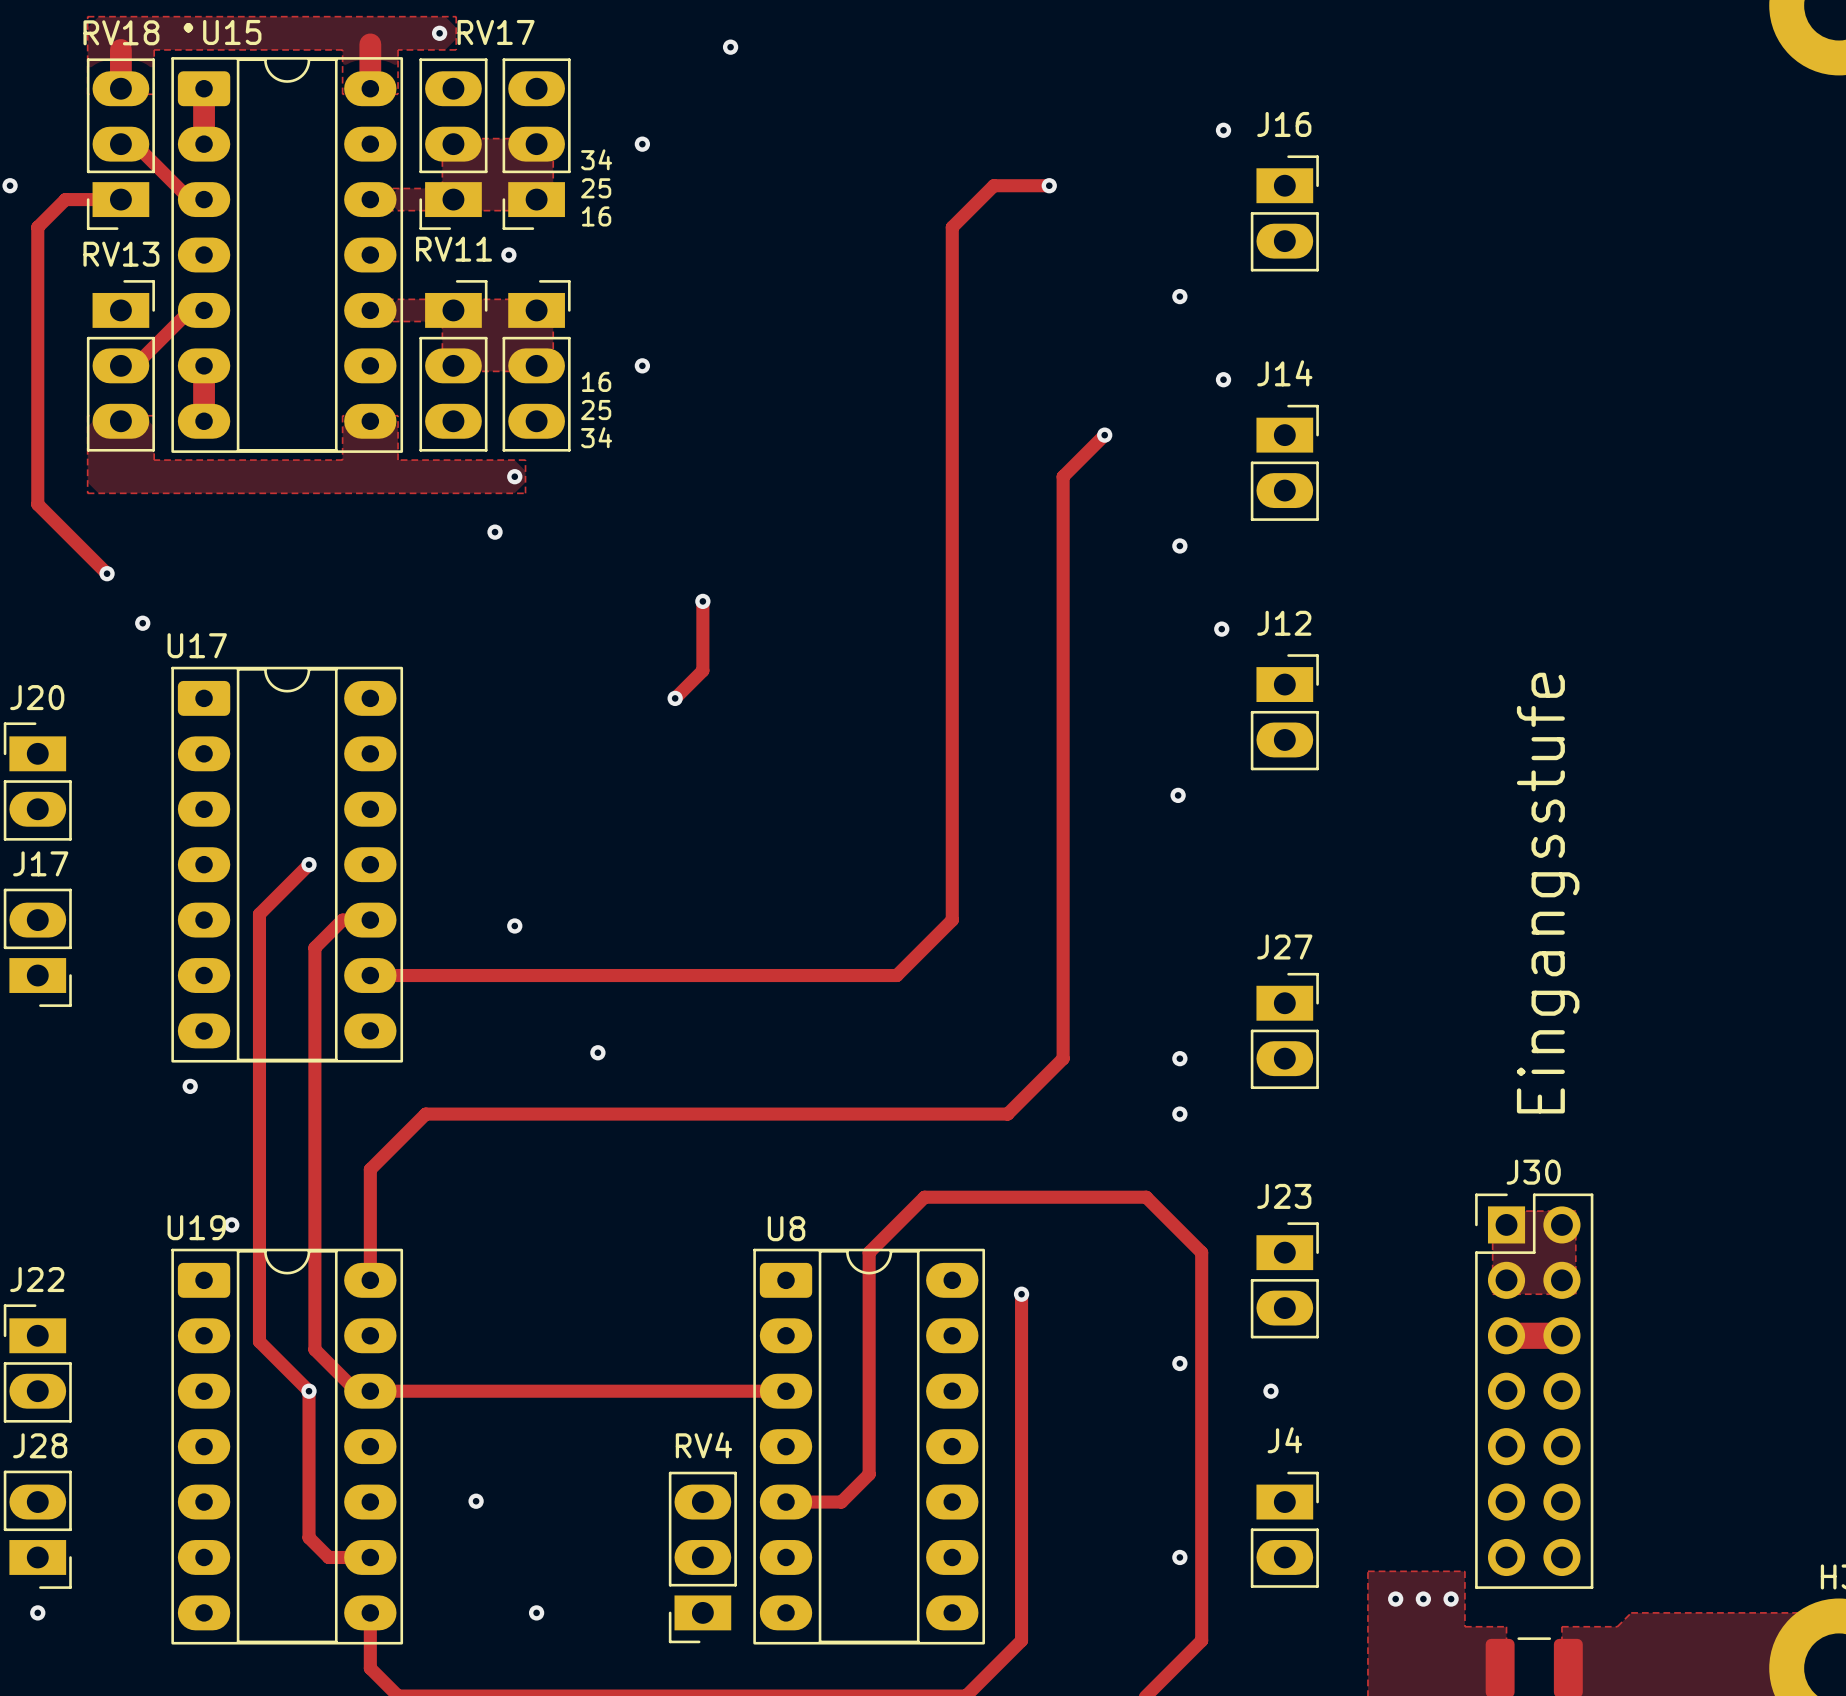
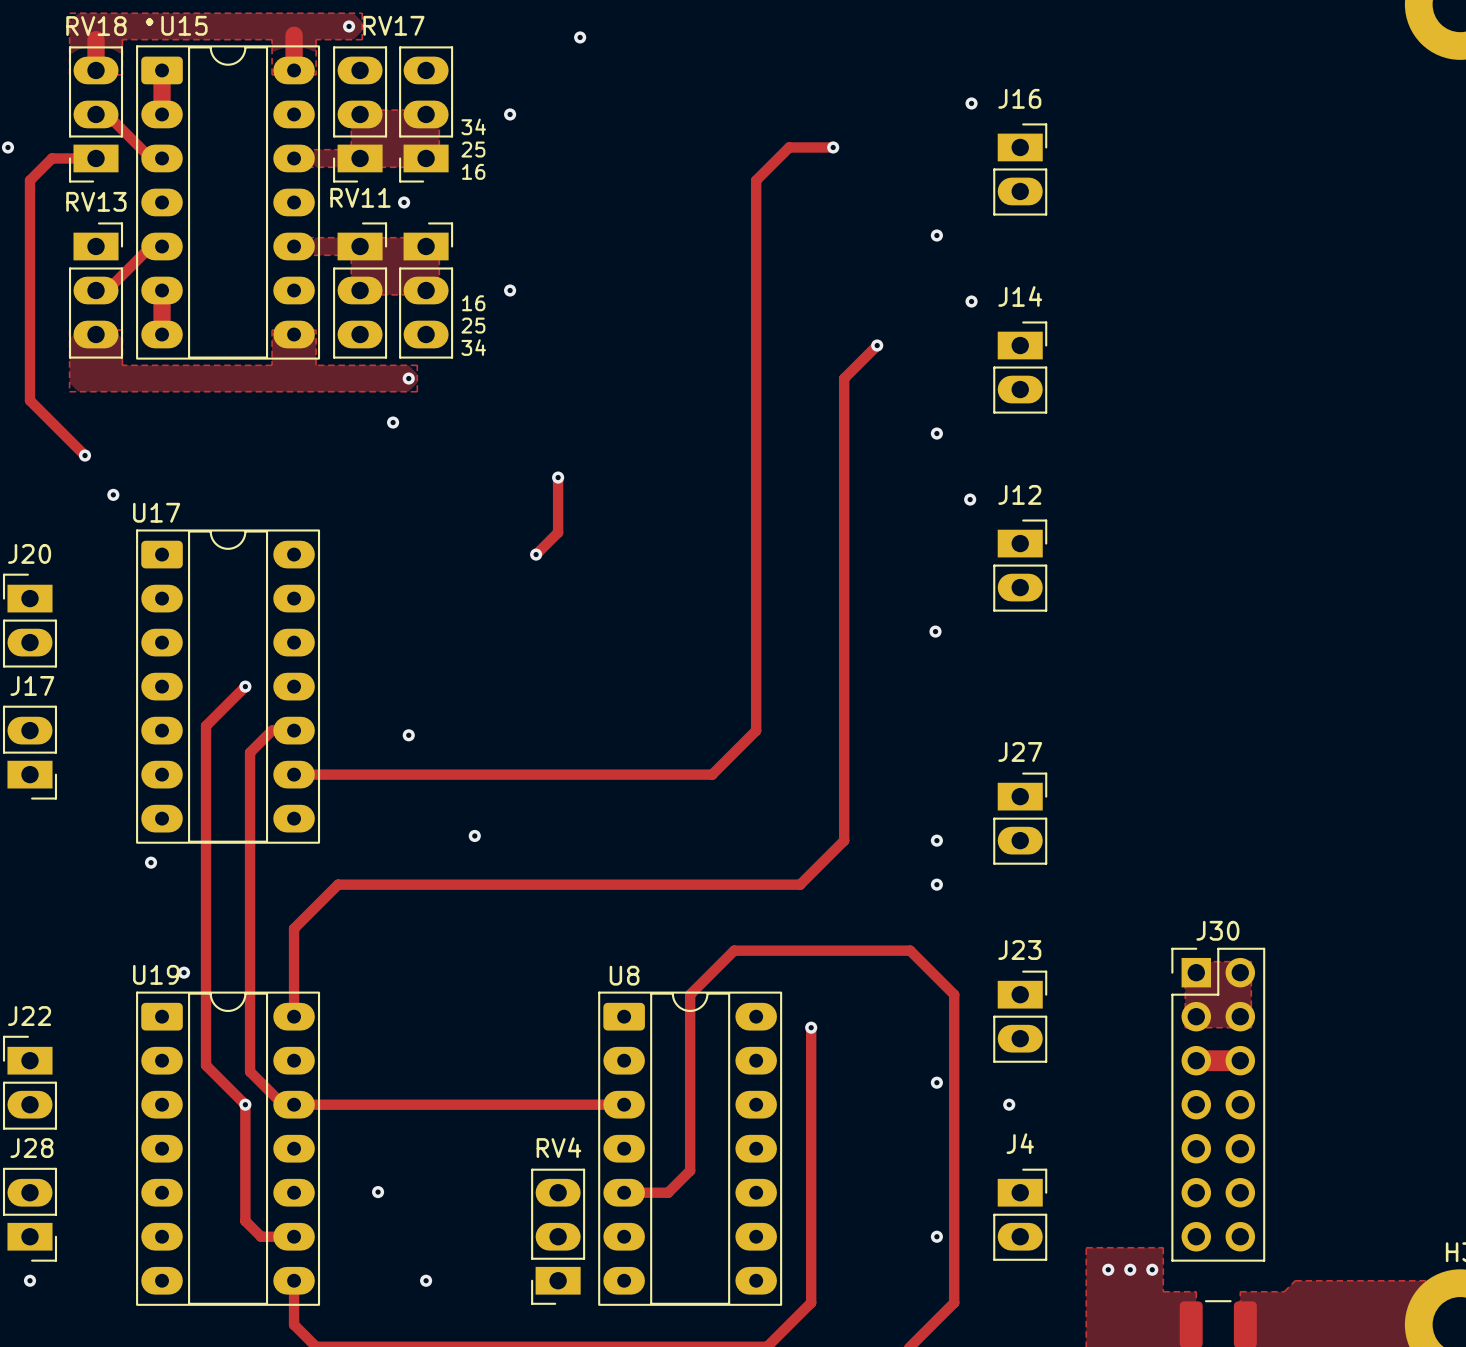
text: Eingangsstufe (1548, 893) -> none

